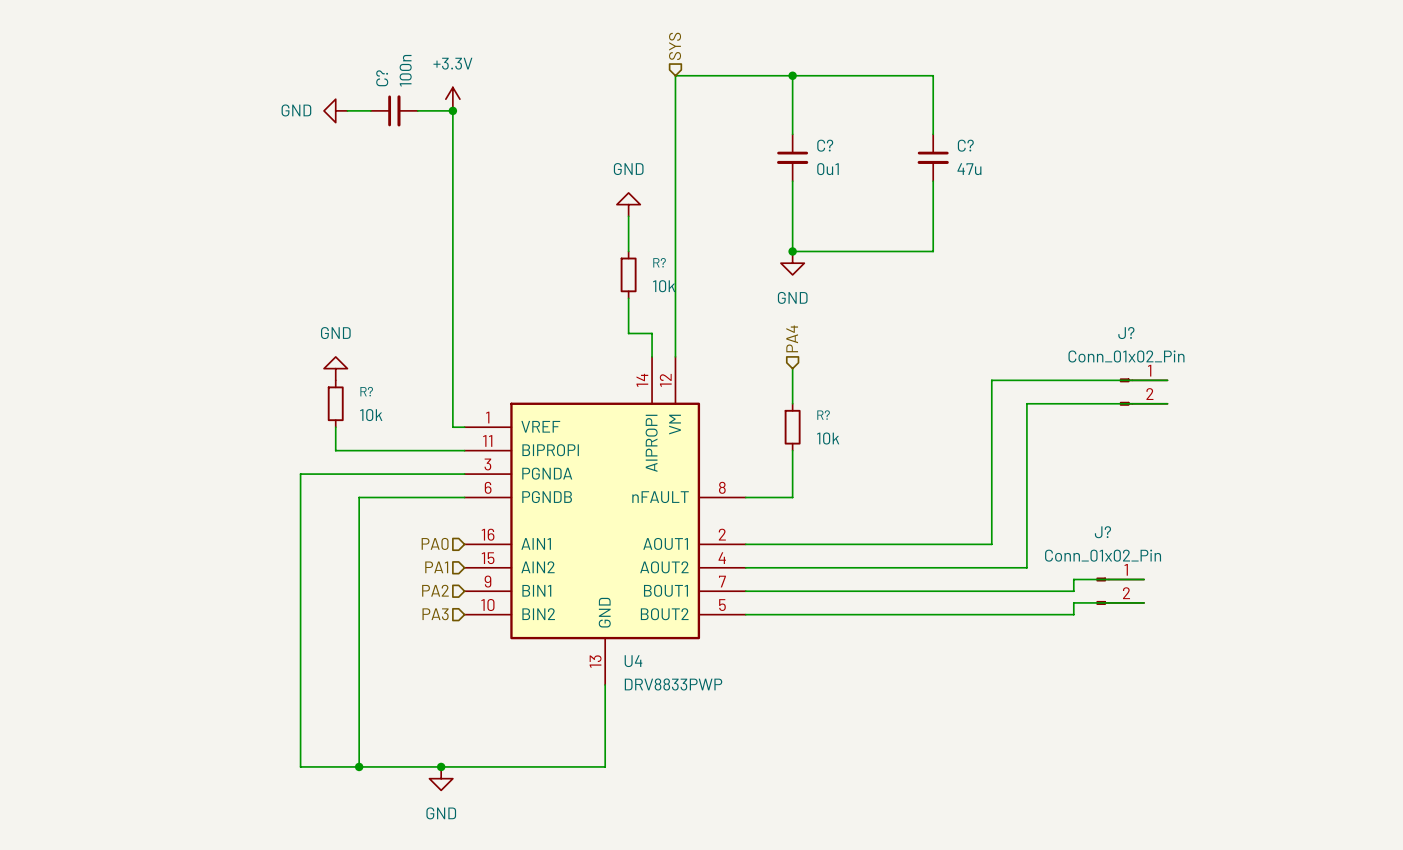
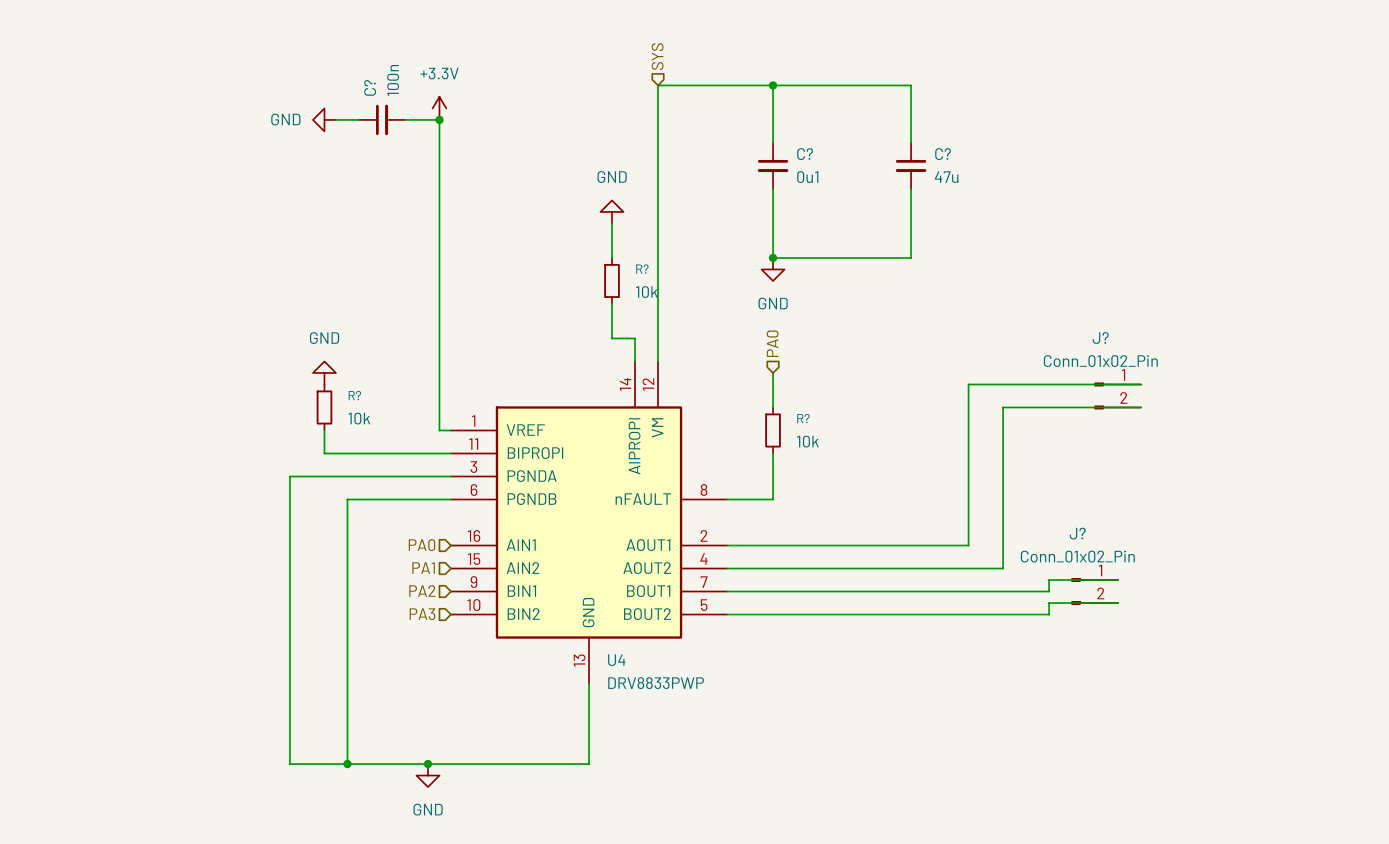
hierarchical label: PA4 (792, 338) -> PA0 (772, 343)

